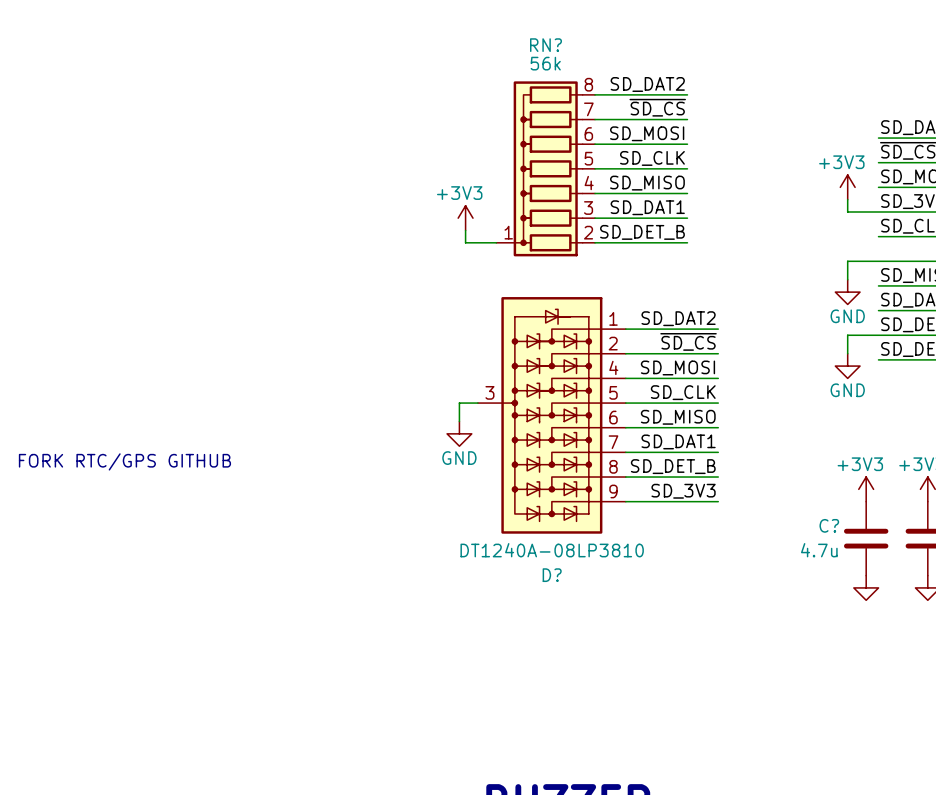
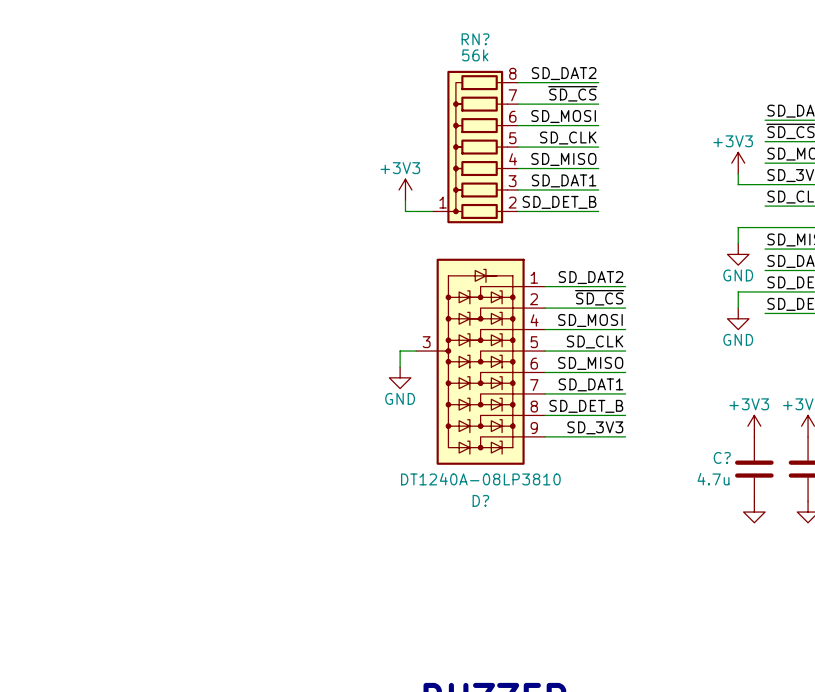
text: FORK RTC/GPS GITHUB (124, 461) -> none

